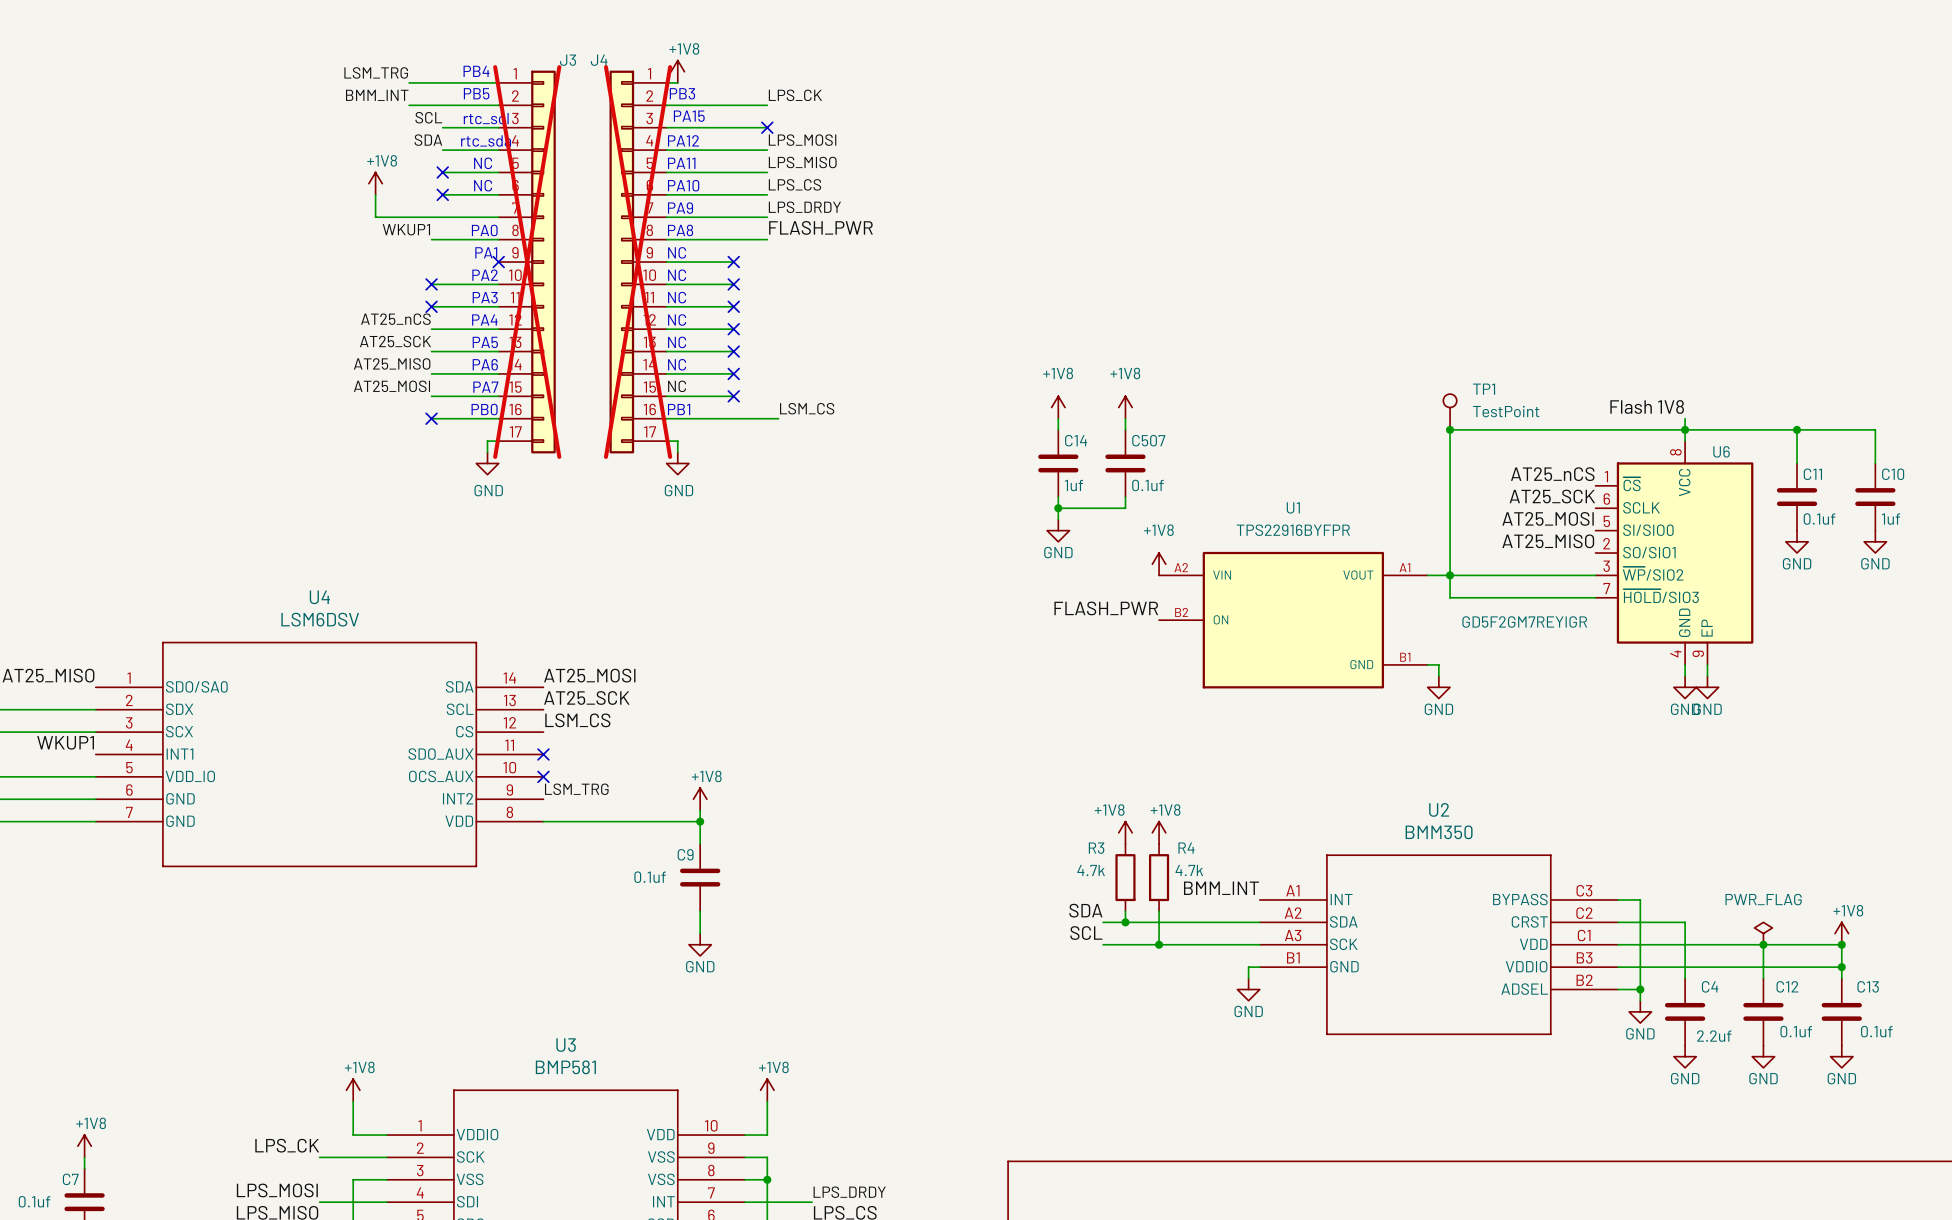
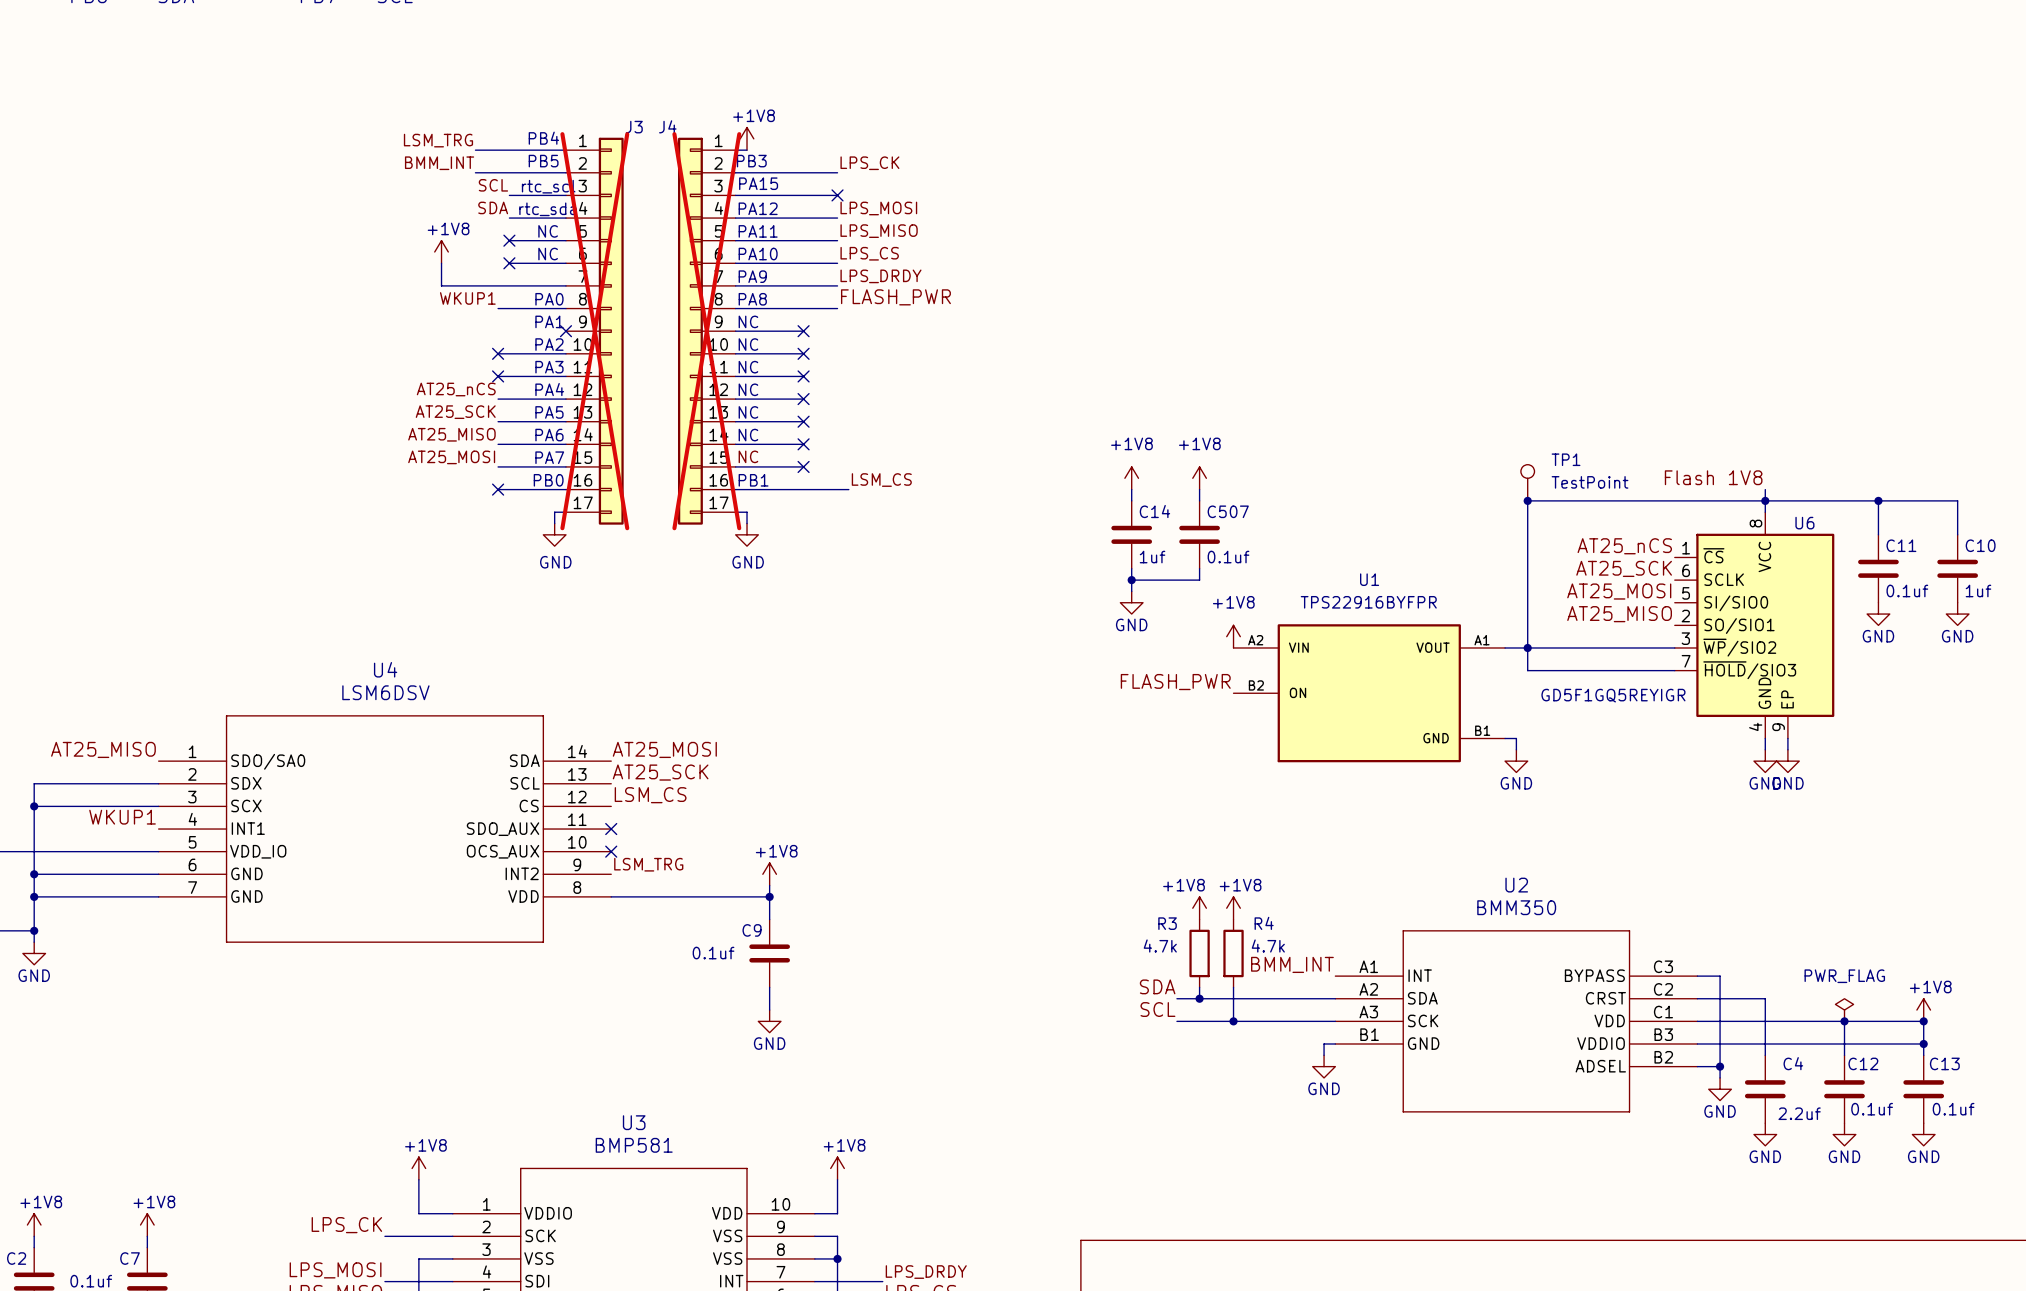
U6 value: GD5F2GM7REYIGR (1524, 621) -> GD5F1GQ5REYIGR (1613, 695)

